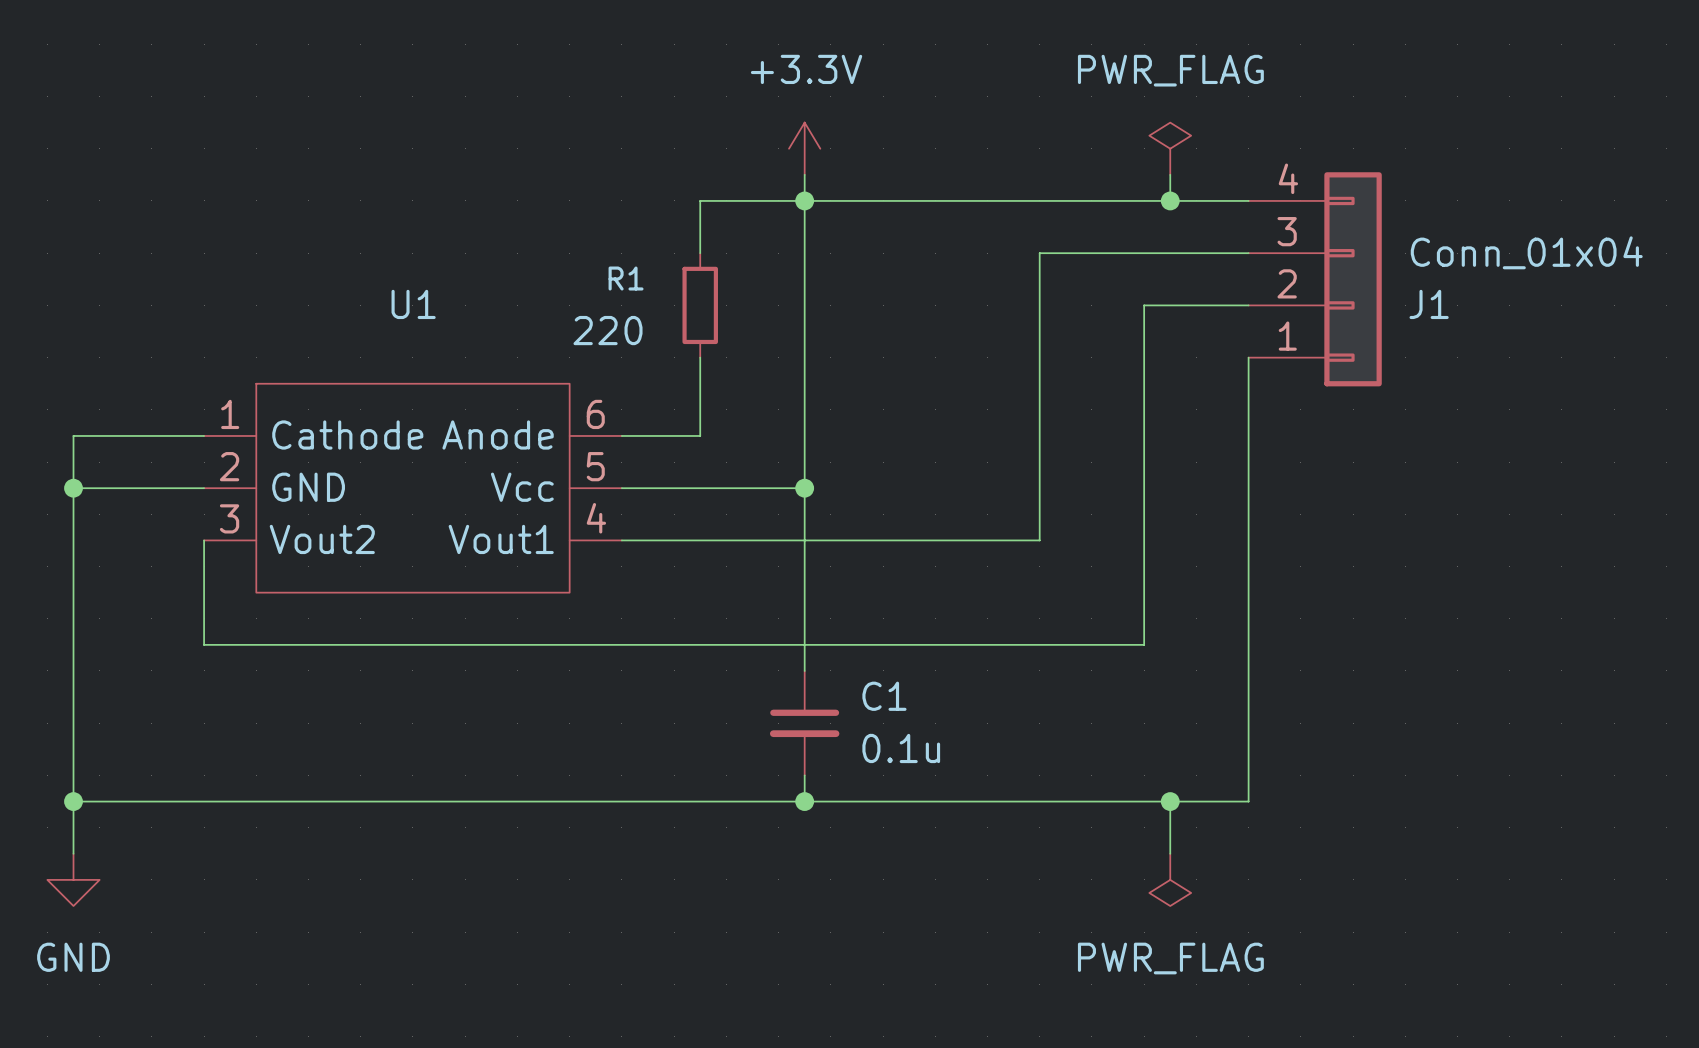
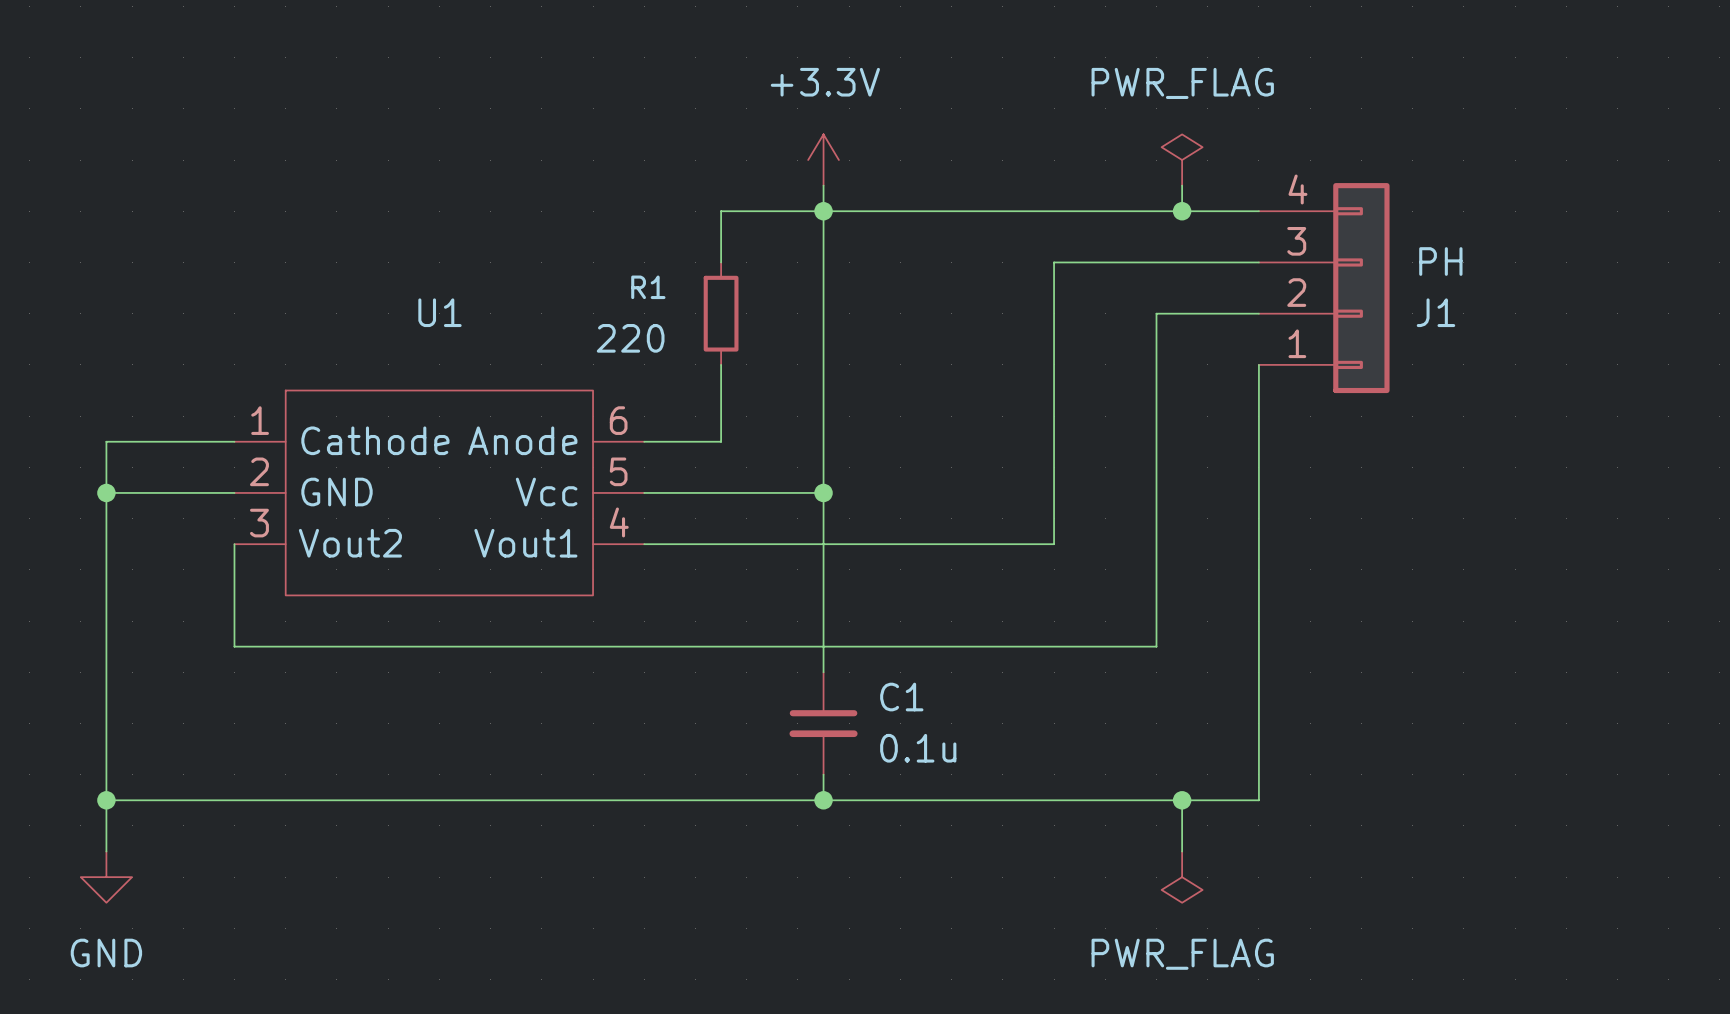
J1 value: Conn_01x04 (1526, 252) -> PH (1440, 261)

